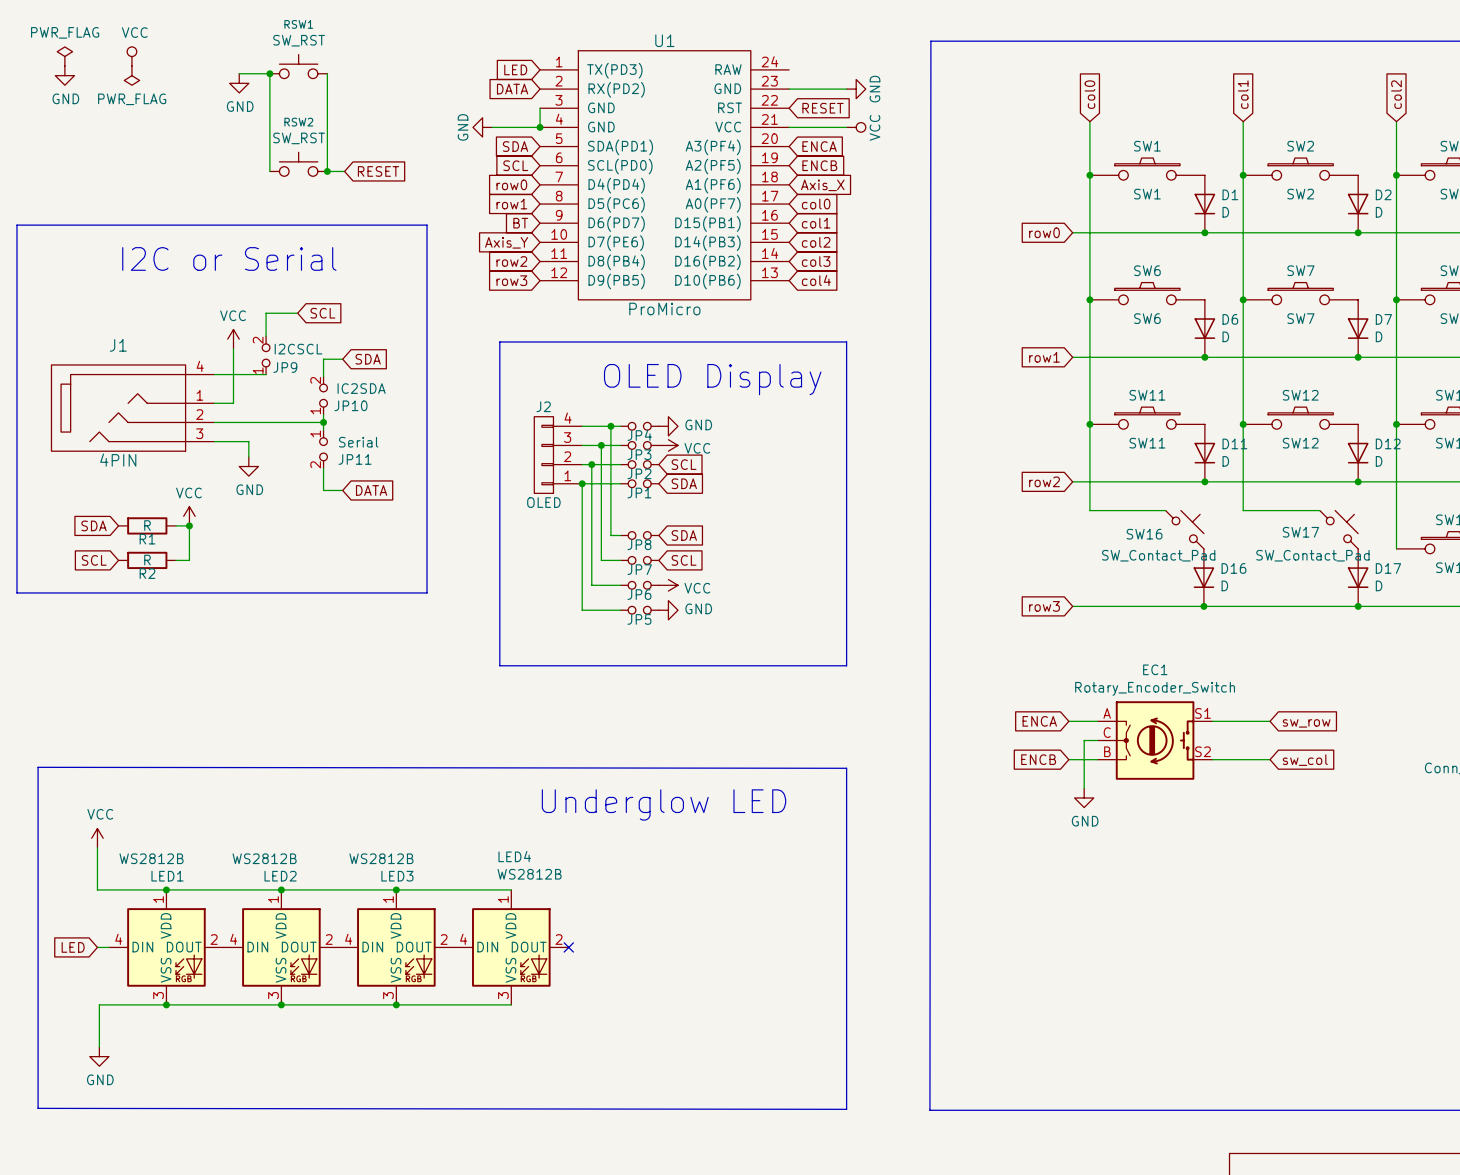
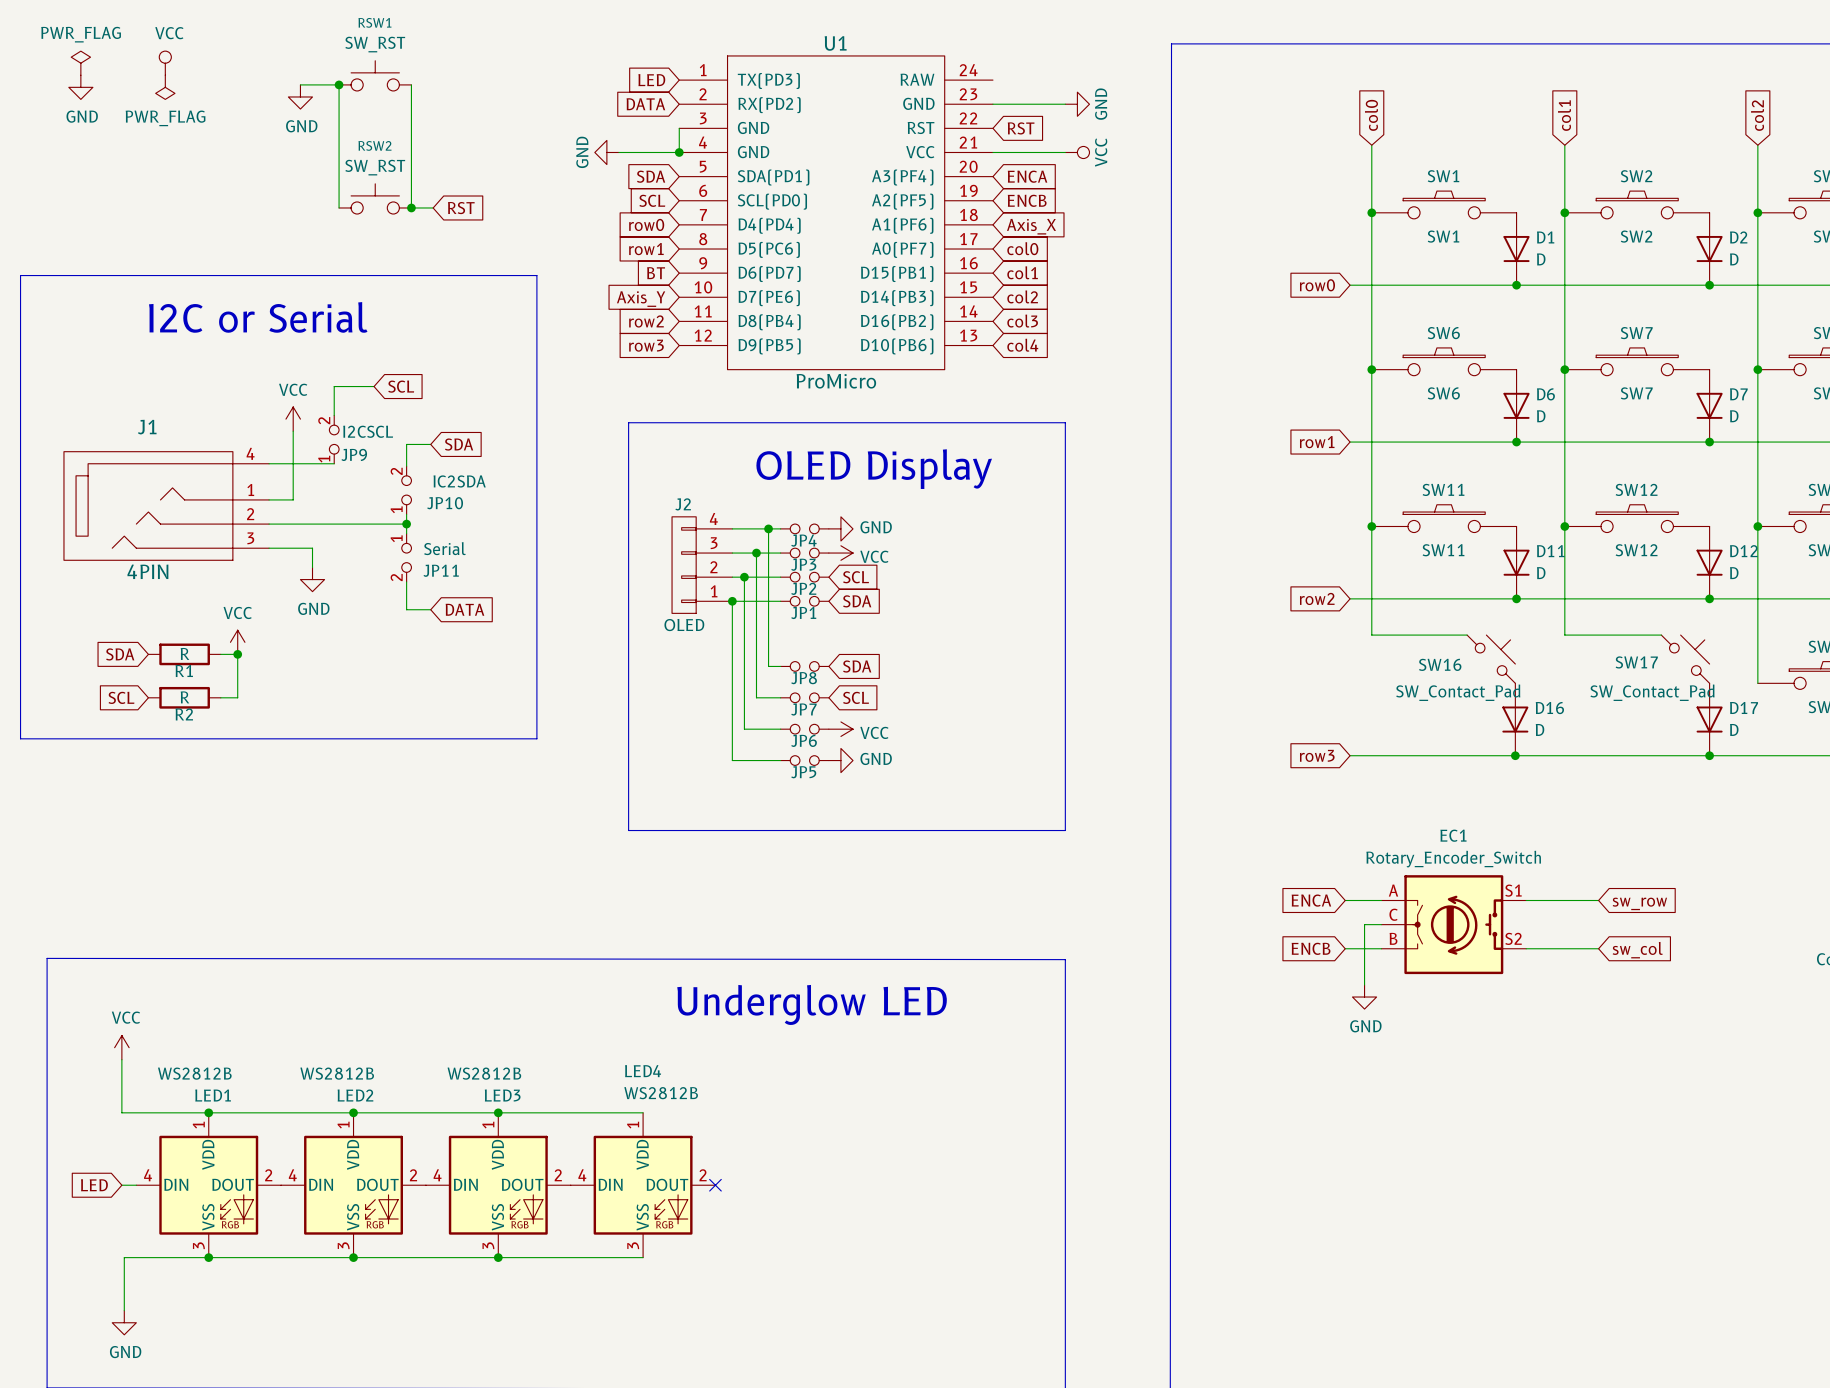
global label: RESET (823, 108) -> RST (1021, 128)
global label: RESET (378, 171) -> RST (461, 208)

